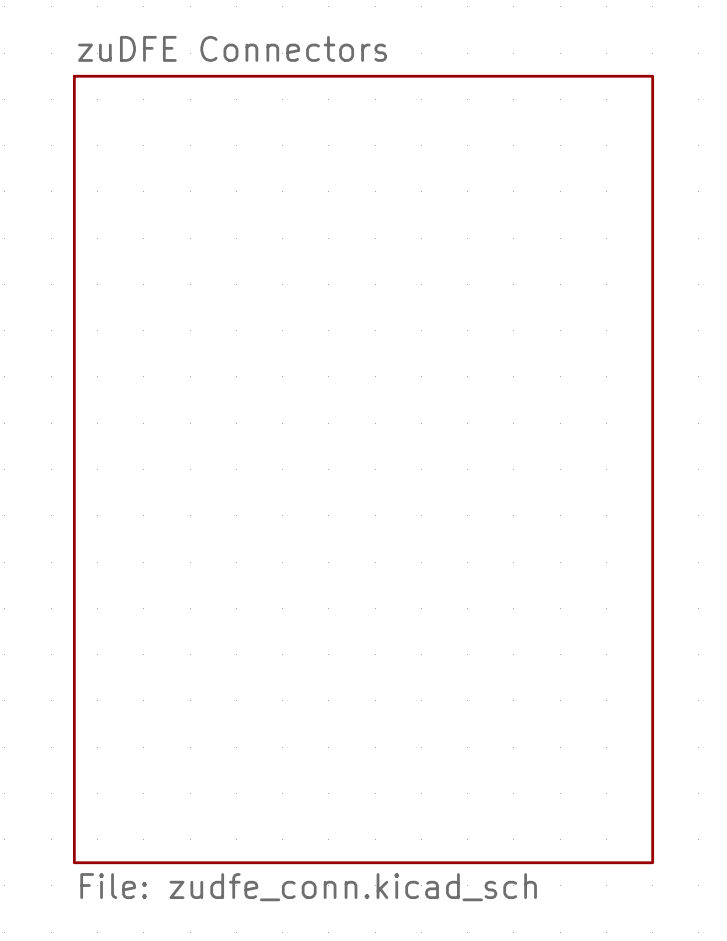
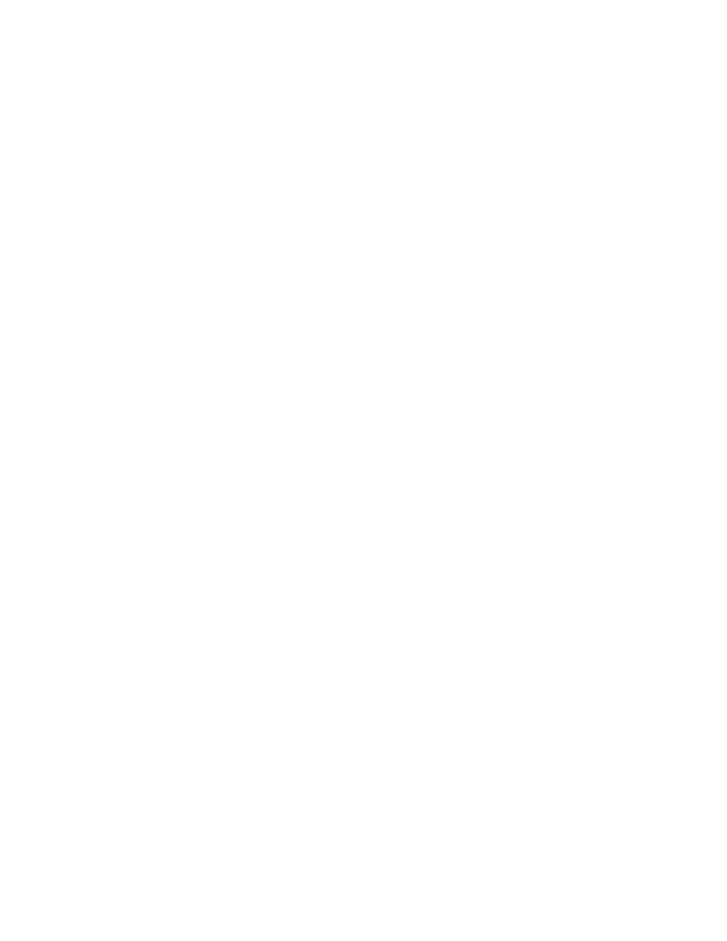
sheet zuDFE Connectors: File: zudfe_conn.kicad_sch (363, 469) -> none

